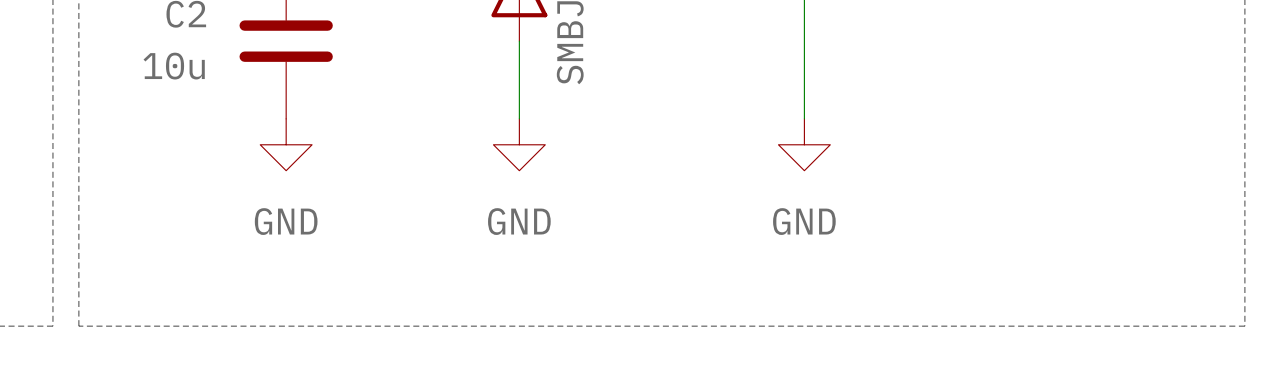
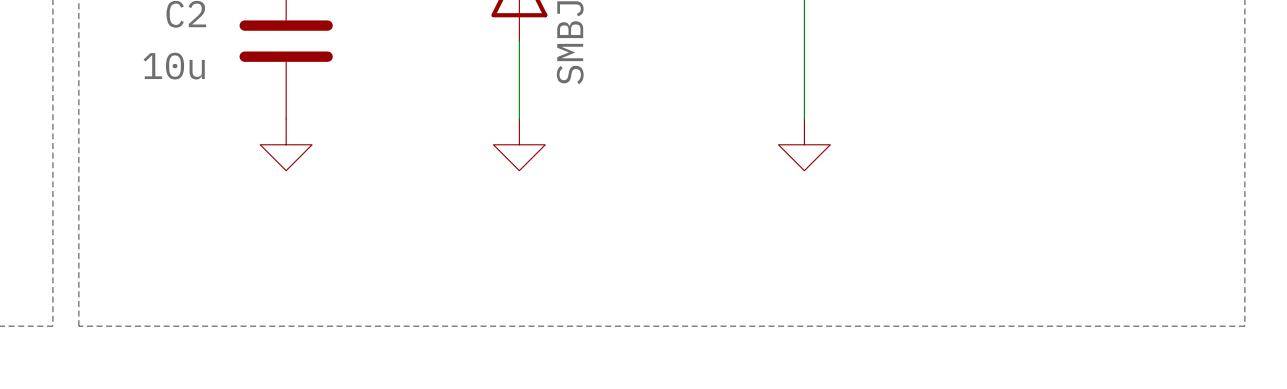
power symbol text: GND (286, 221) -> none
power symbol text: GND (519, 221) -> none
power symbol text: GND (804, 221) -> none

